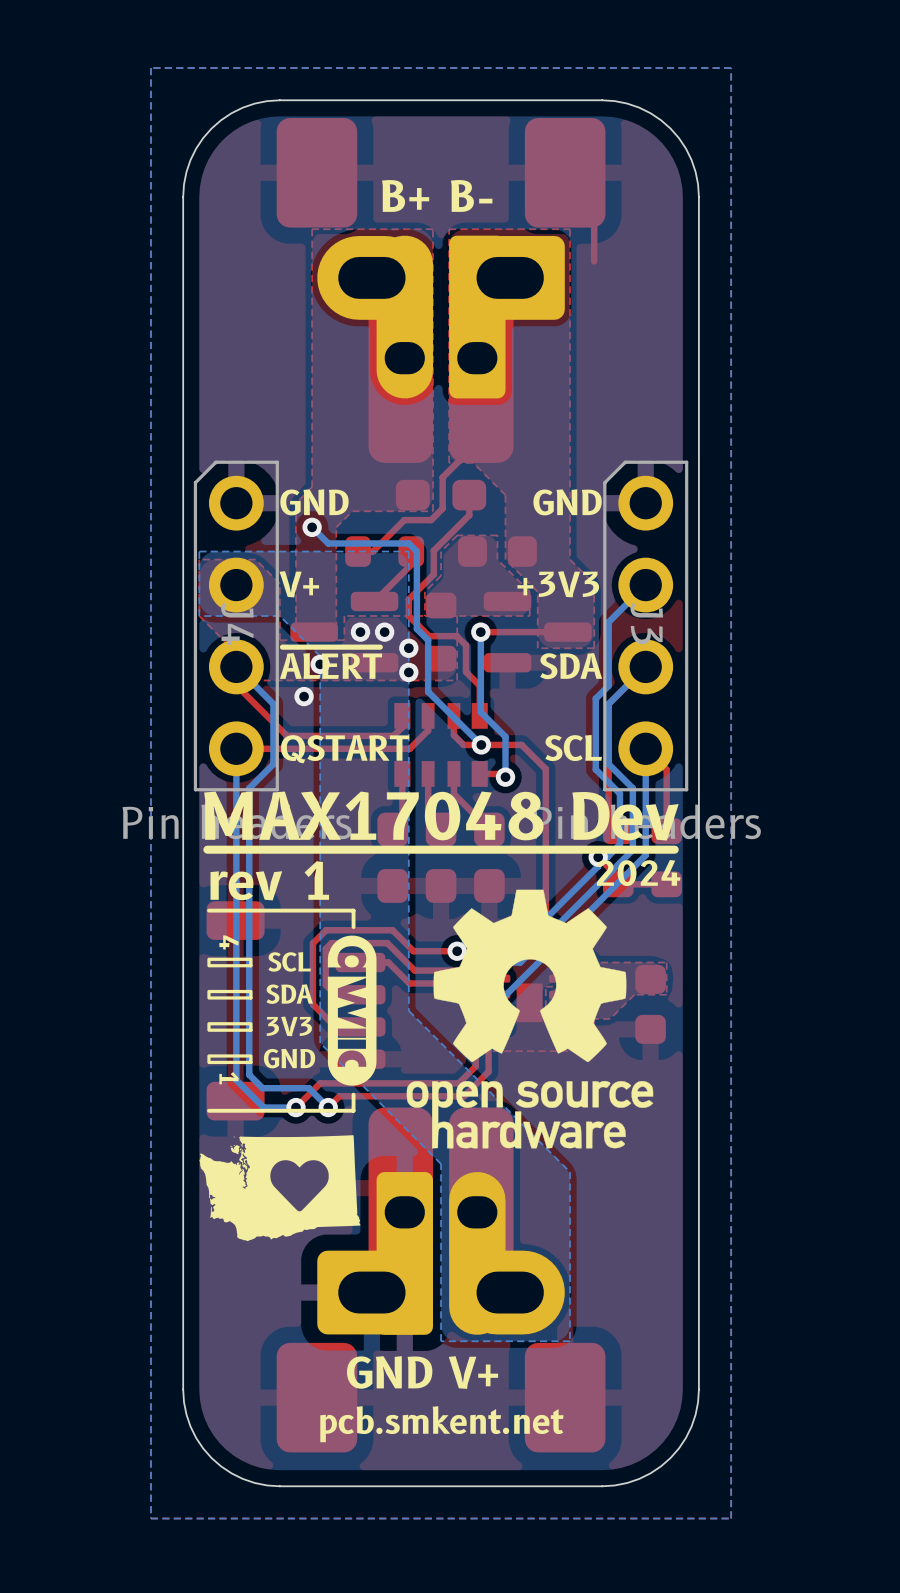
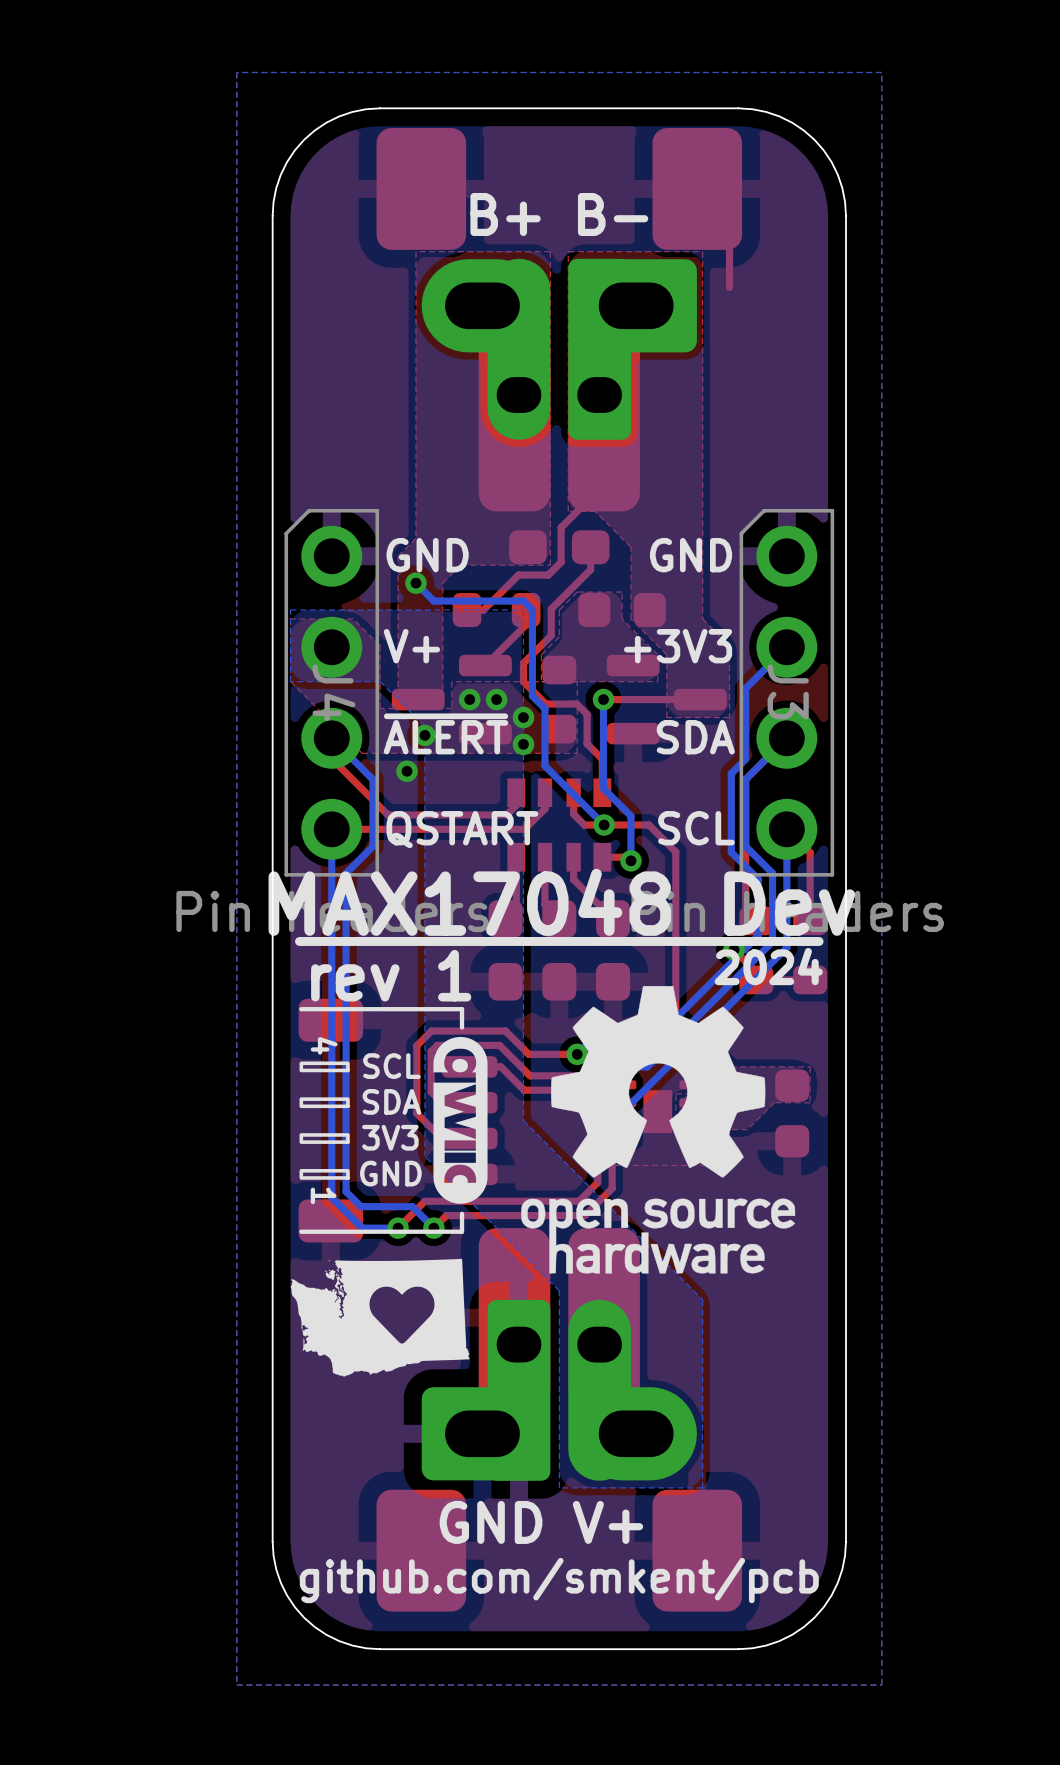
text: pcb.smkent.net (441, 1424) -> github.com/smkent/pcb (559, 1580)

